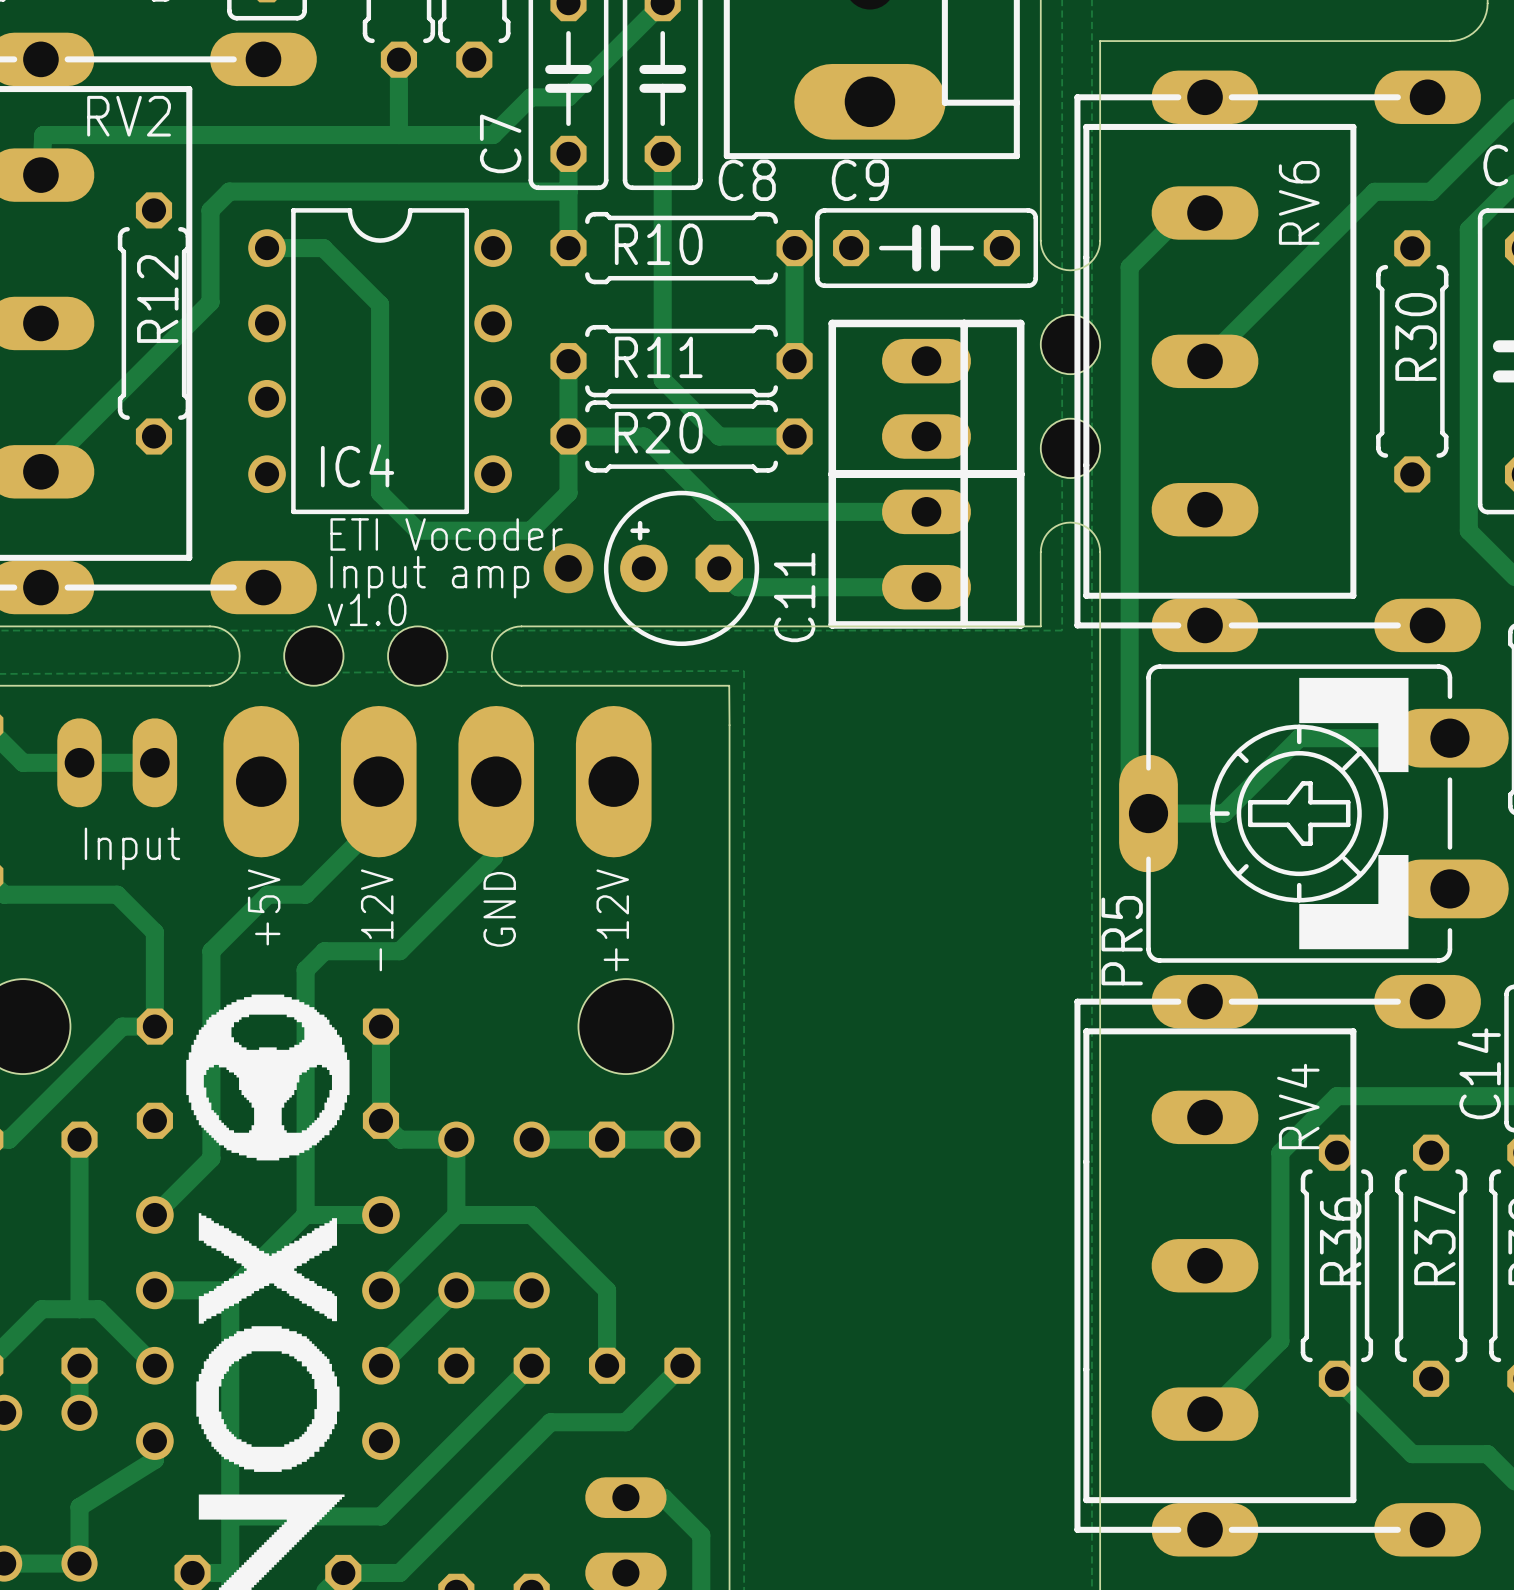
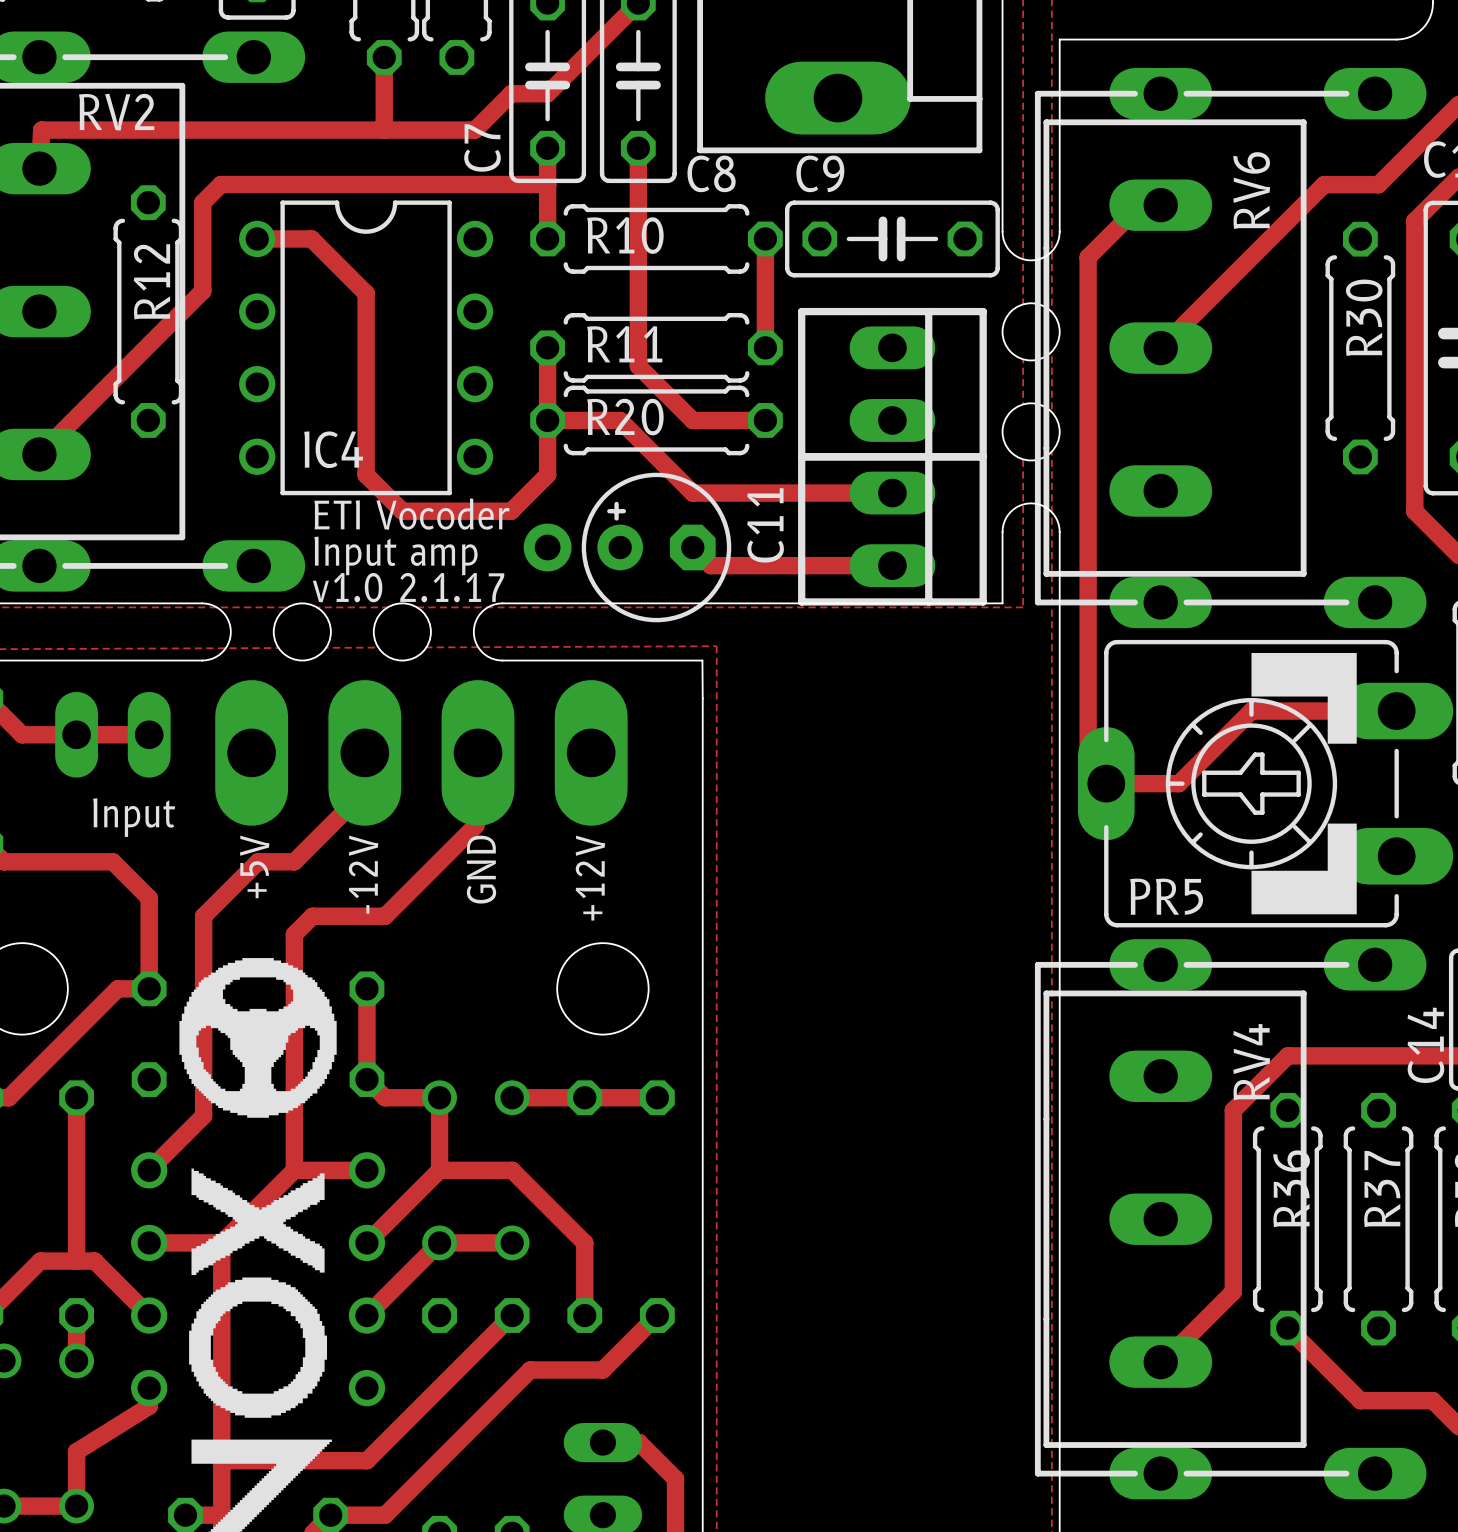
C11 name position: C11 (794, 597) -> C11 (765, 525)
text: v1.0 (367, 609) -> v1.0 2.1.17 (408, 587)
PR5 name rotation: 0° (1122, 940) -> 90° clockwise (1166, 896)

